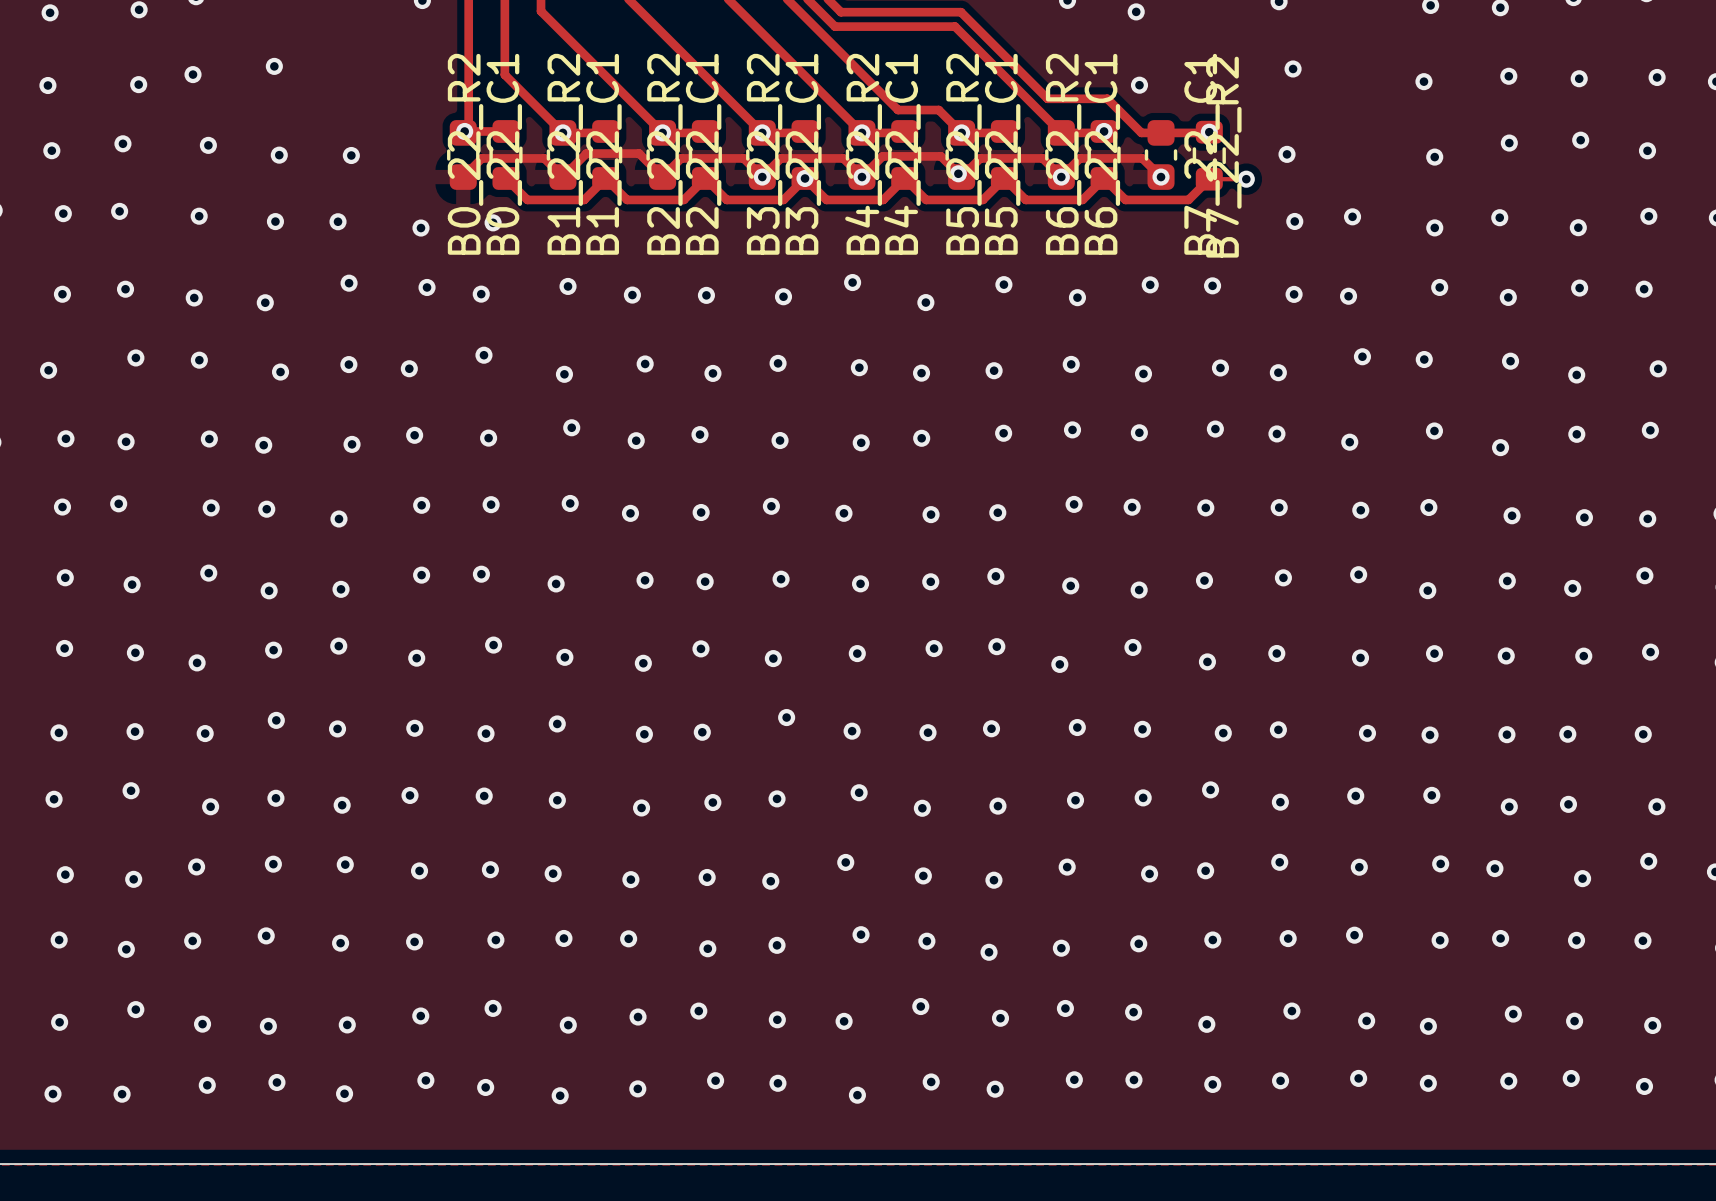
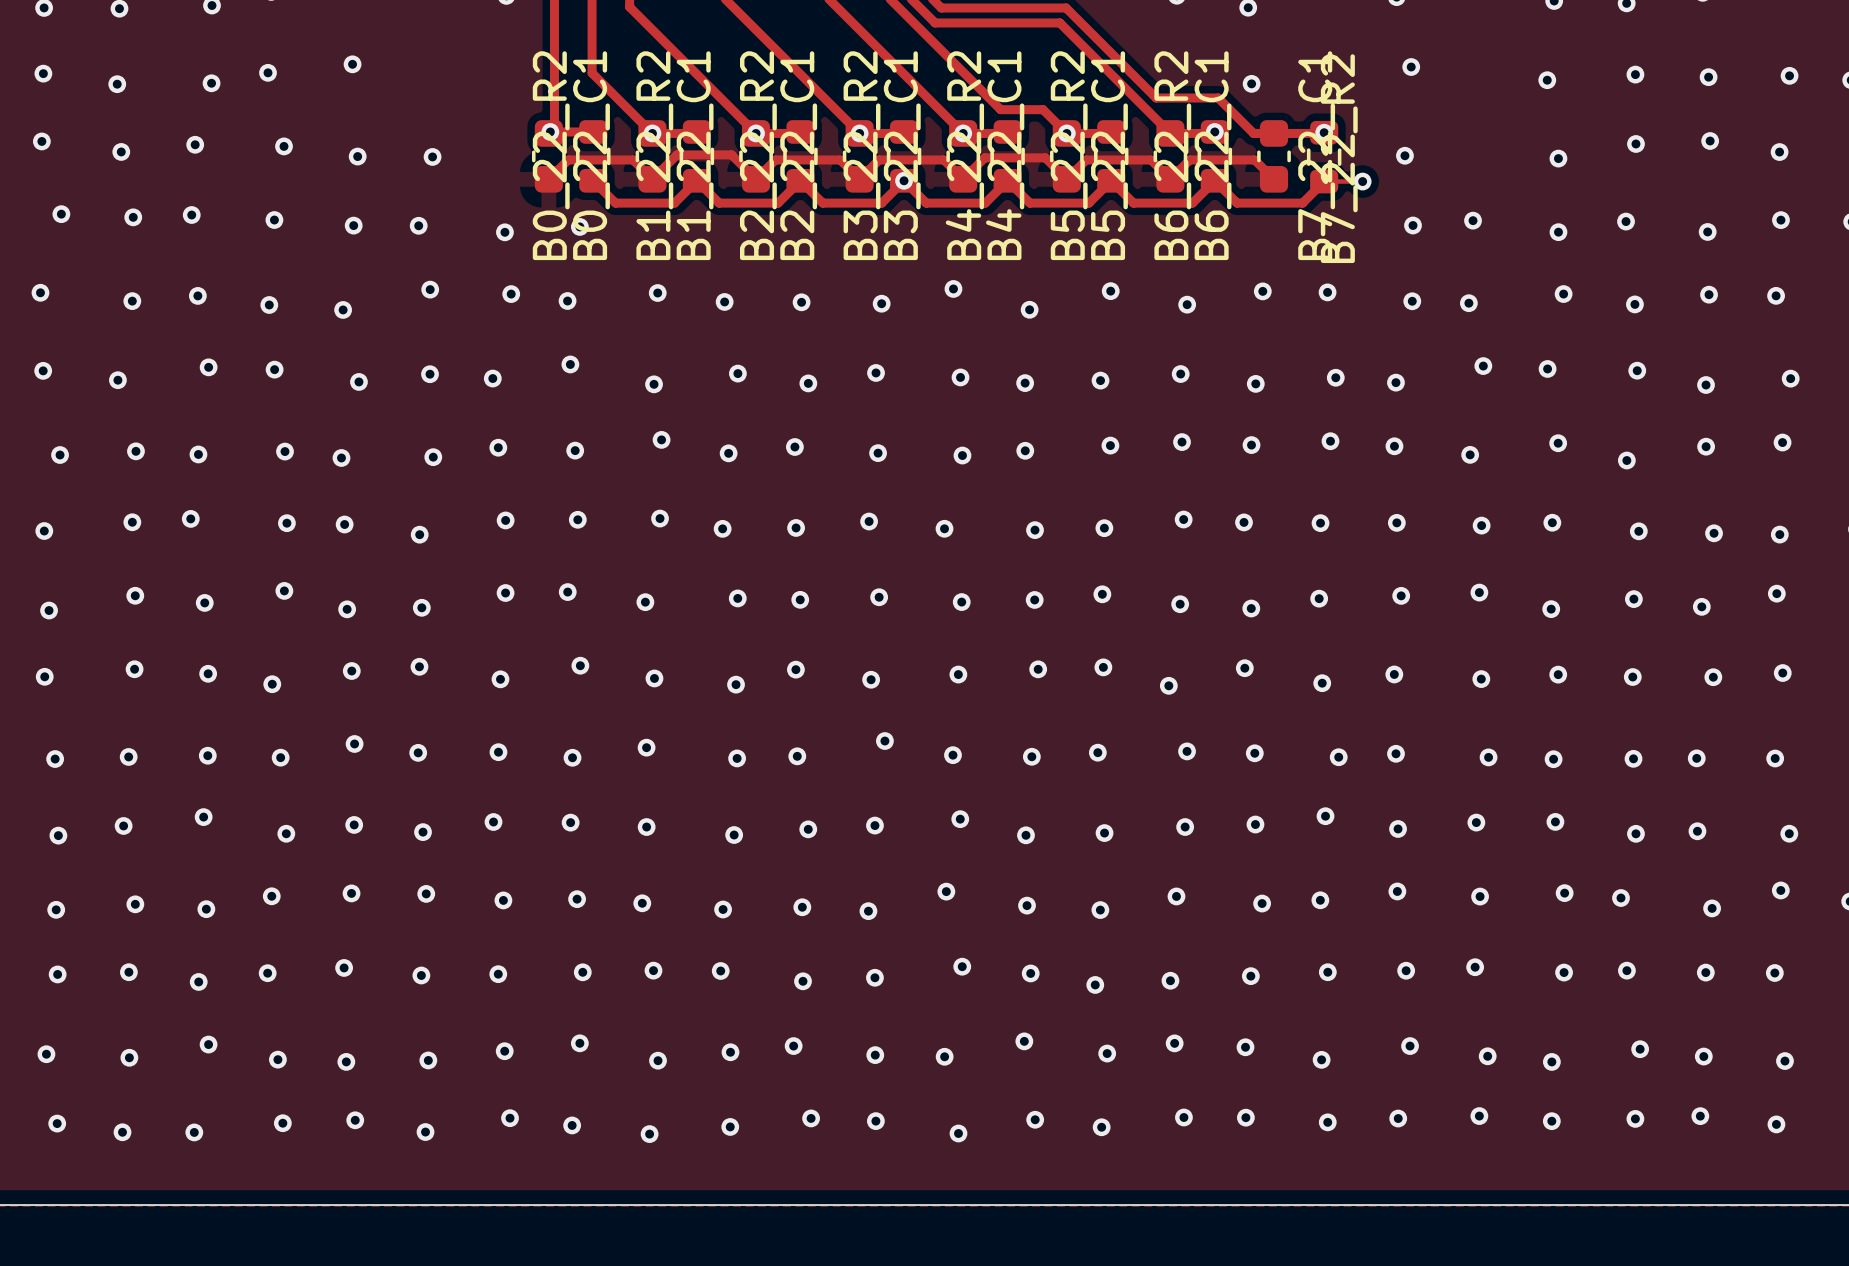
via: (958, 173) -> none
via: (762, 177) -> none
via: (861, 177) -> none
via: (1061, 177) -> none
via: (1161, 177) -> none

